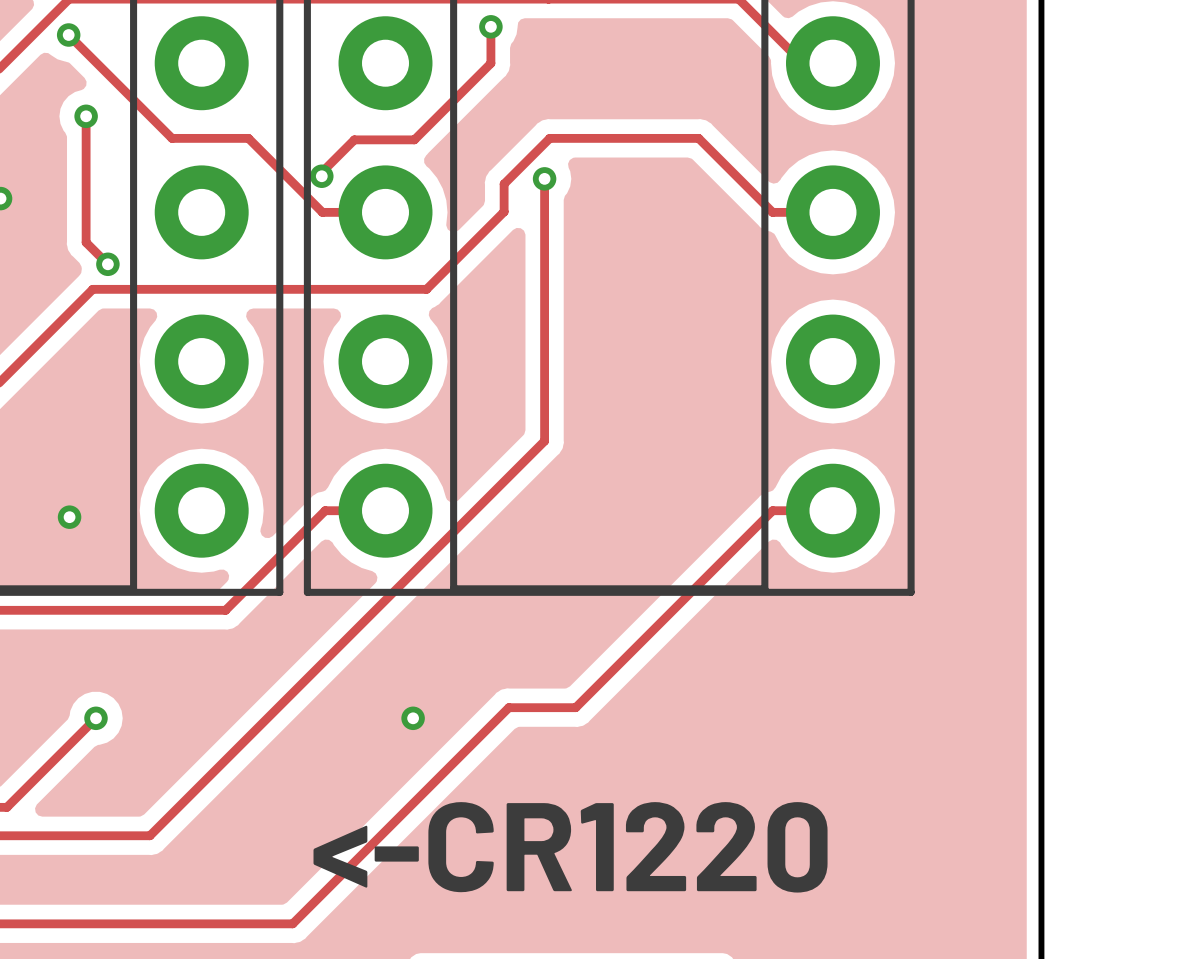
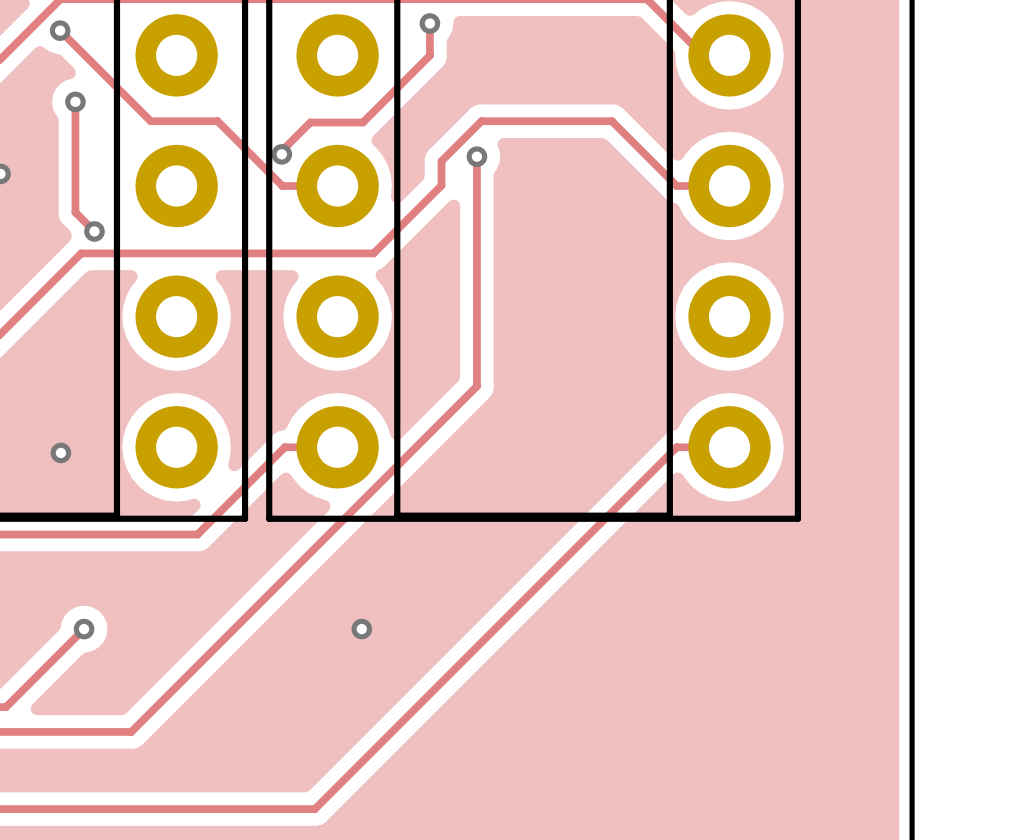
track: (575, 707) (508, 707) (292, 923) -> (504, 619) (314, 809) (256, 809)
text: <-CR1220 (570, 847) -> none

